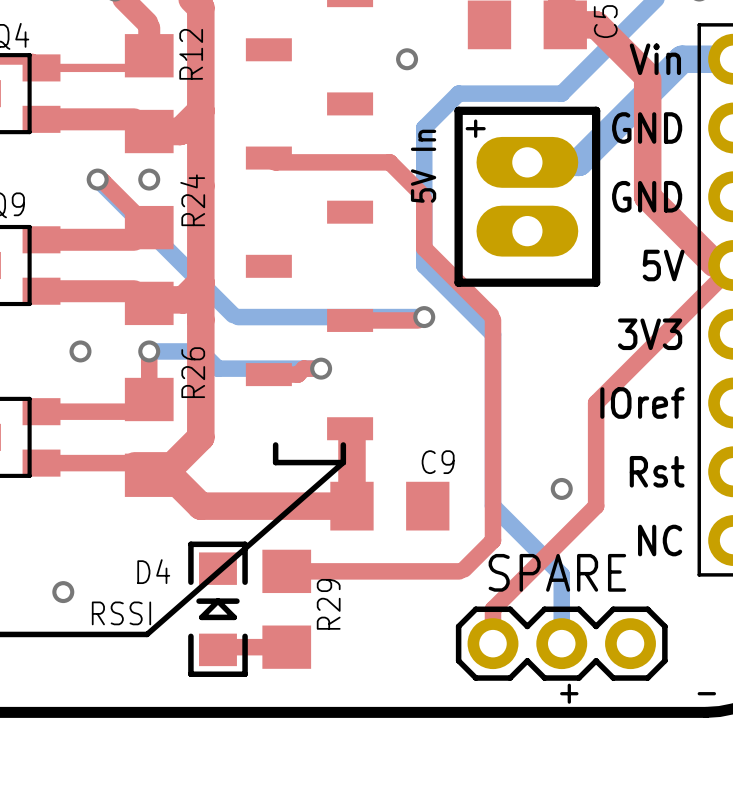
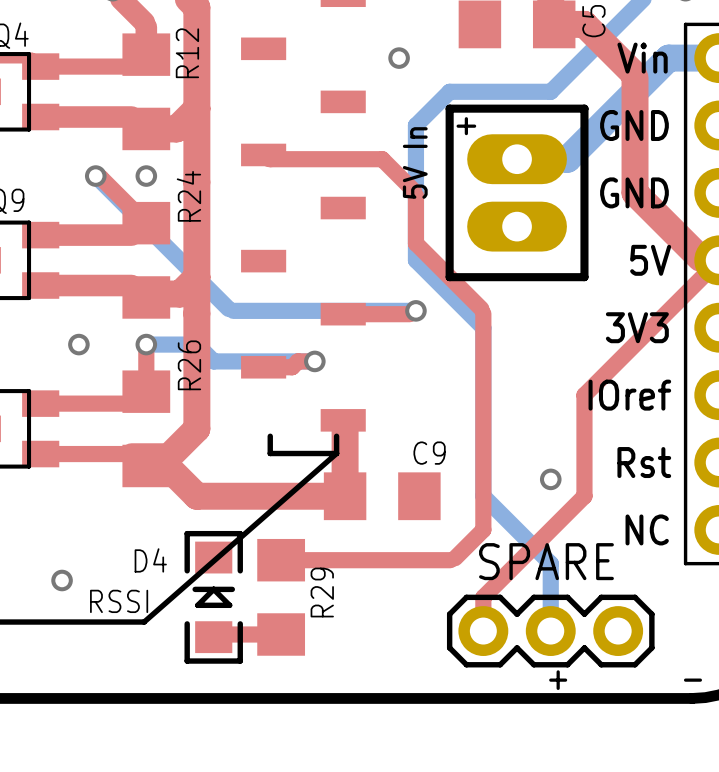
top track width: thin (41, 67) (134, 67) -> thick (40, 66) (131, 66)

